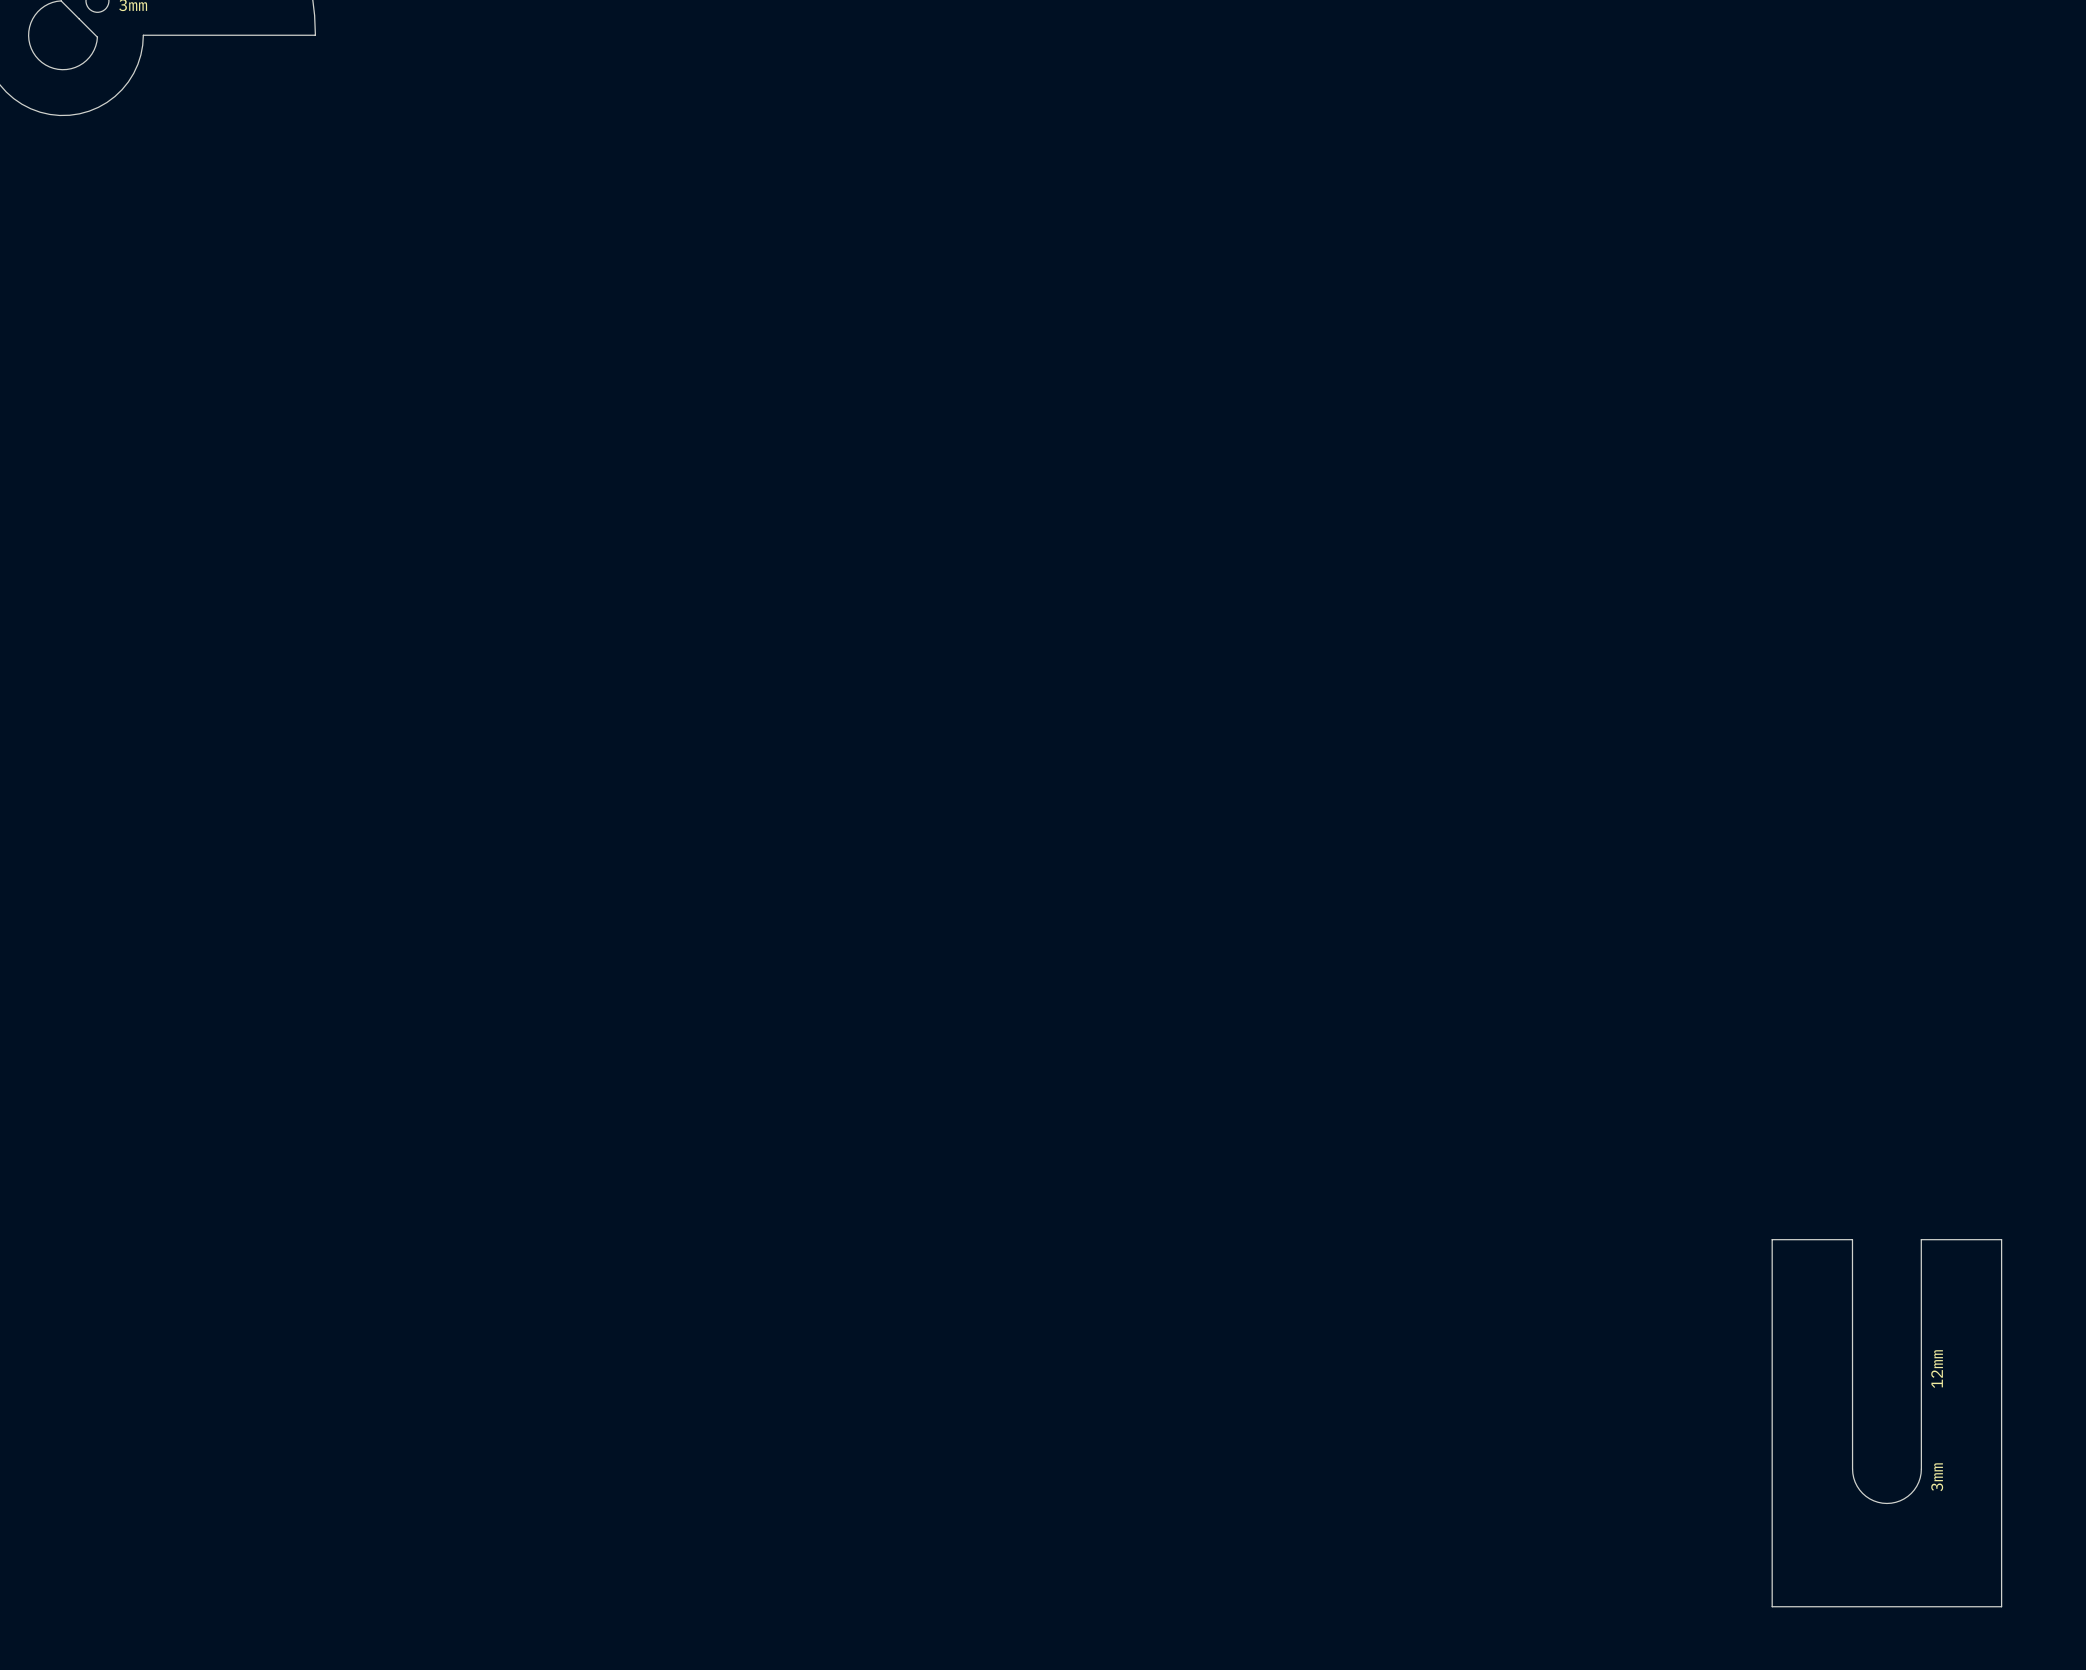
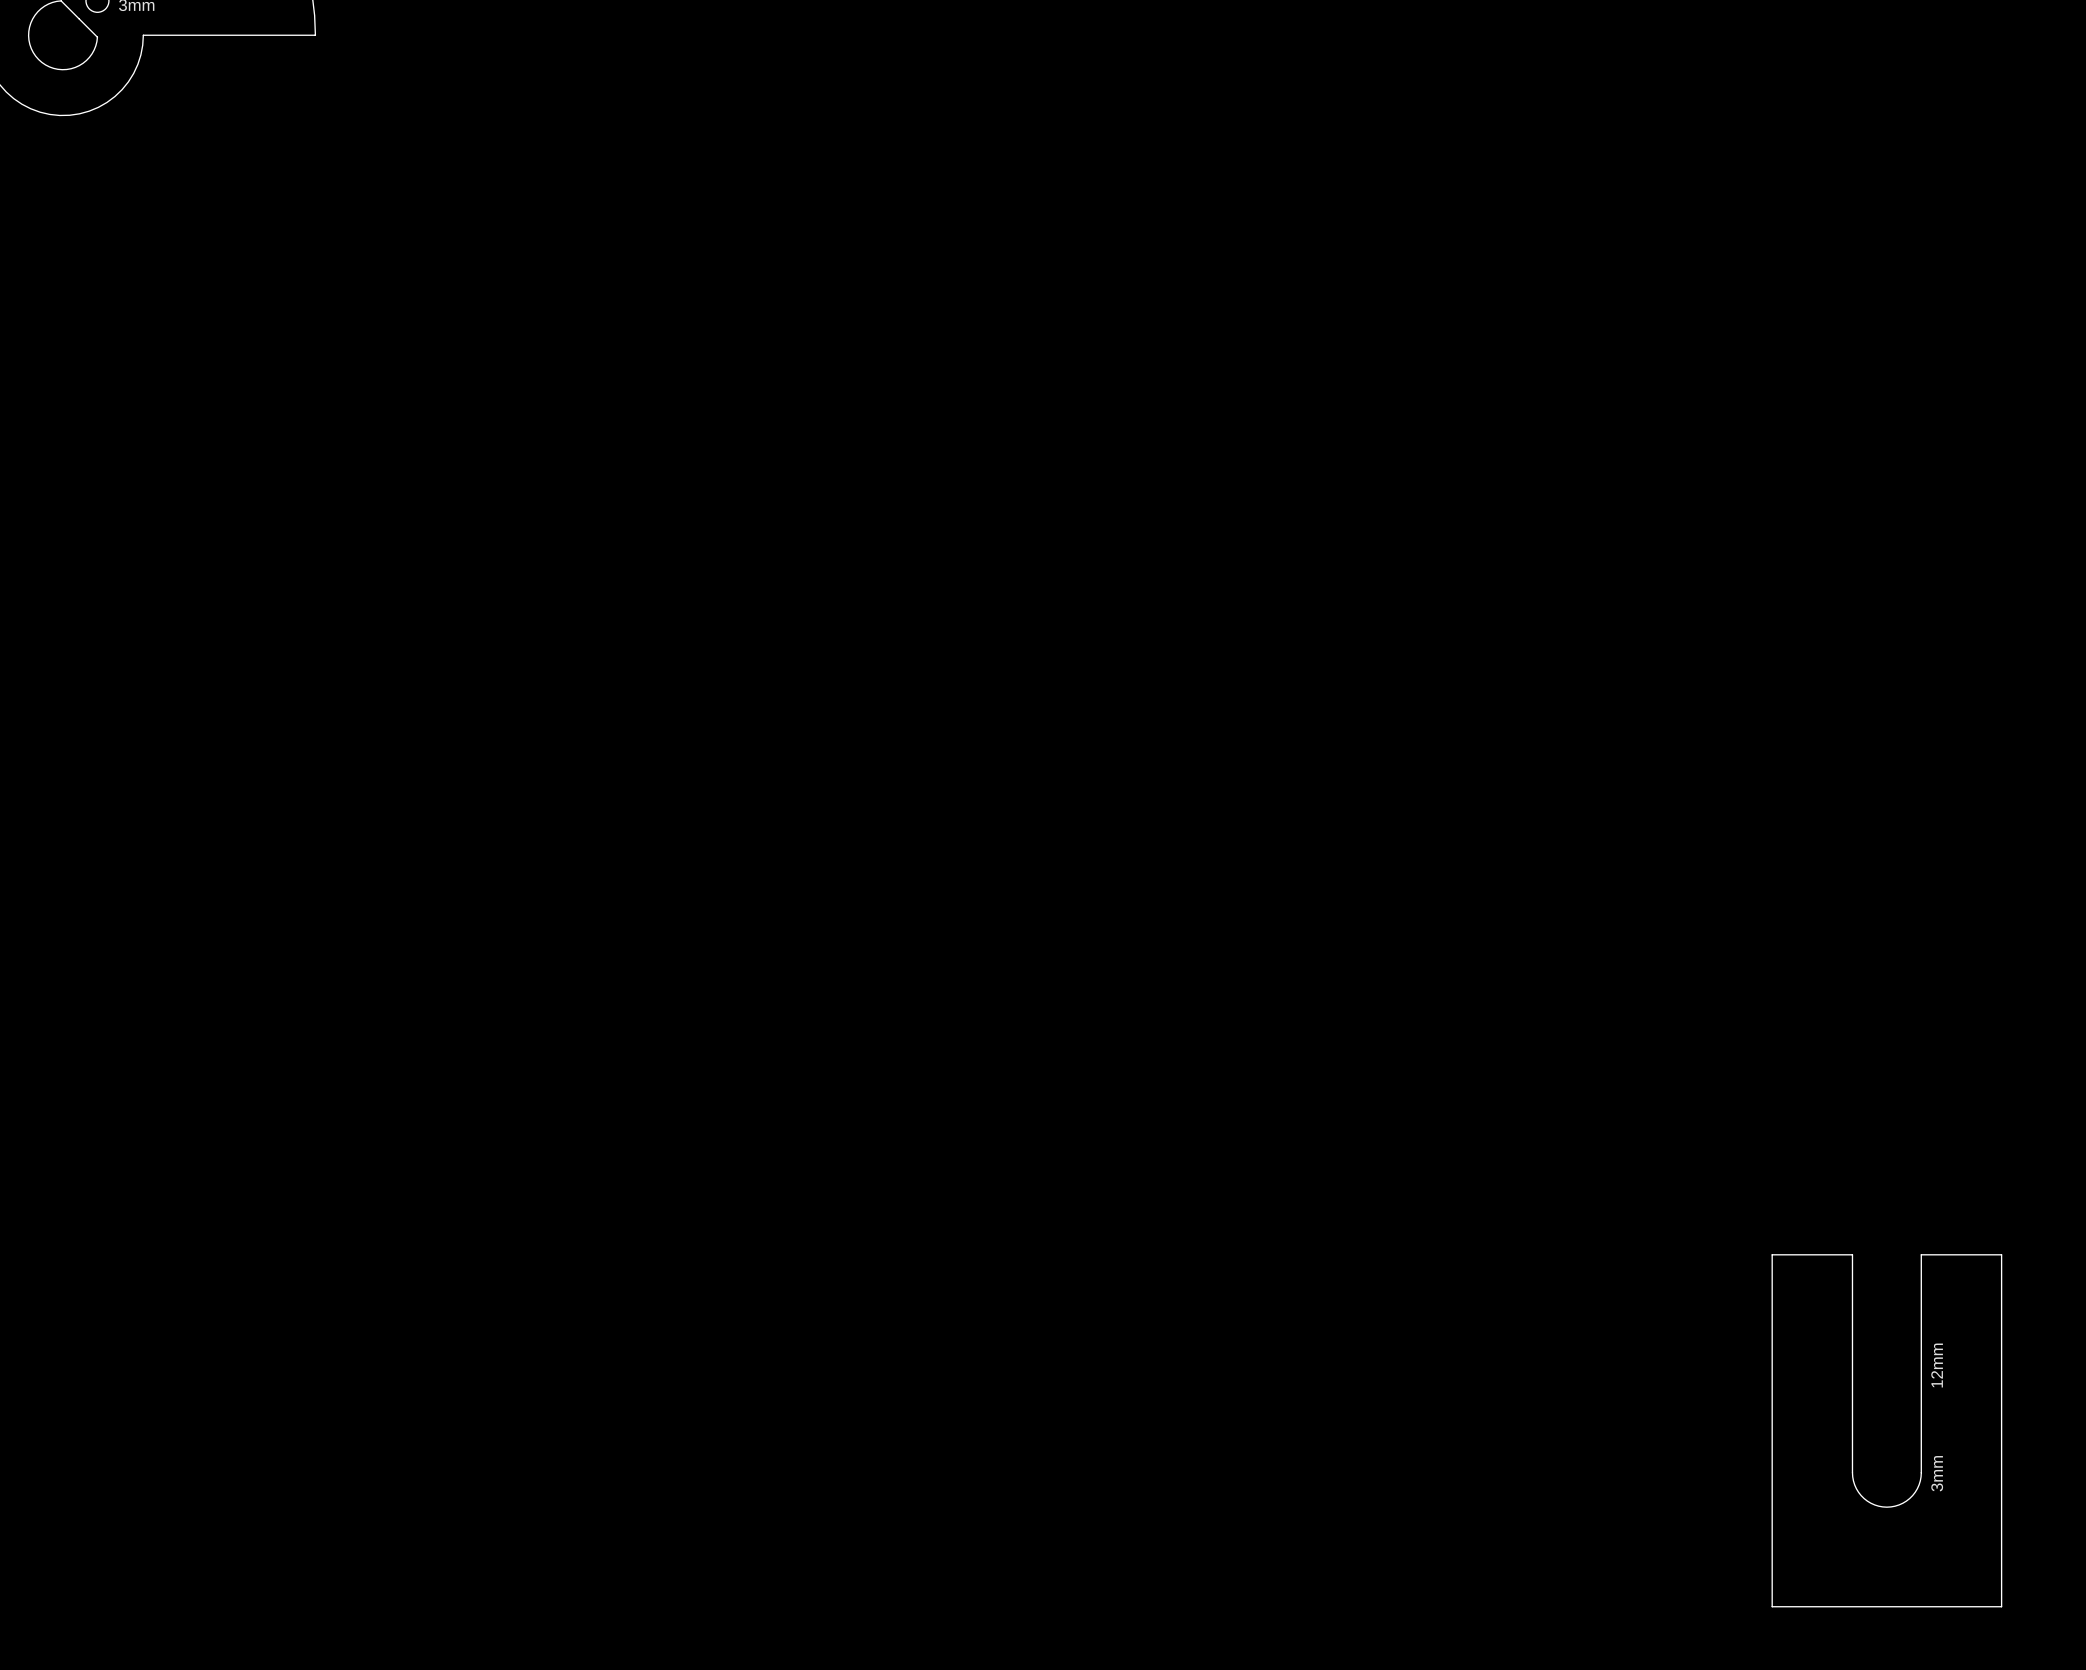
board edge: (1772, 1254) (1772, 1239) (1852, 1239) (1852, 1473) (1857, 1486) (1862, 1493) (1873, 1500) (1886, 1503) (1900, 1500) (1911, 1493) (1916, 1486) (1921, 1473) (1921, 1239) (2001, 1239) (2001, 1254) -> (1772, 1254) (1852, 1254) (1852, 1476) (1856, 1488) (1864, 1498) (1874, 1504) (1886, 1507) (1899, 1504) (1909, 1498) (1917, 1488) (1921, 1476) (1921, 1254) (2001, 1254)

